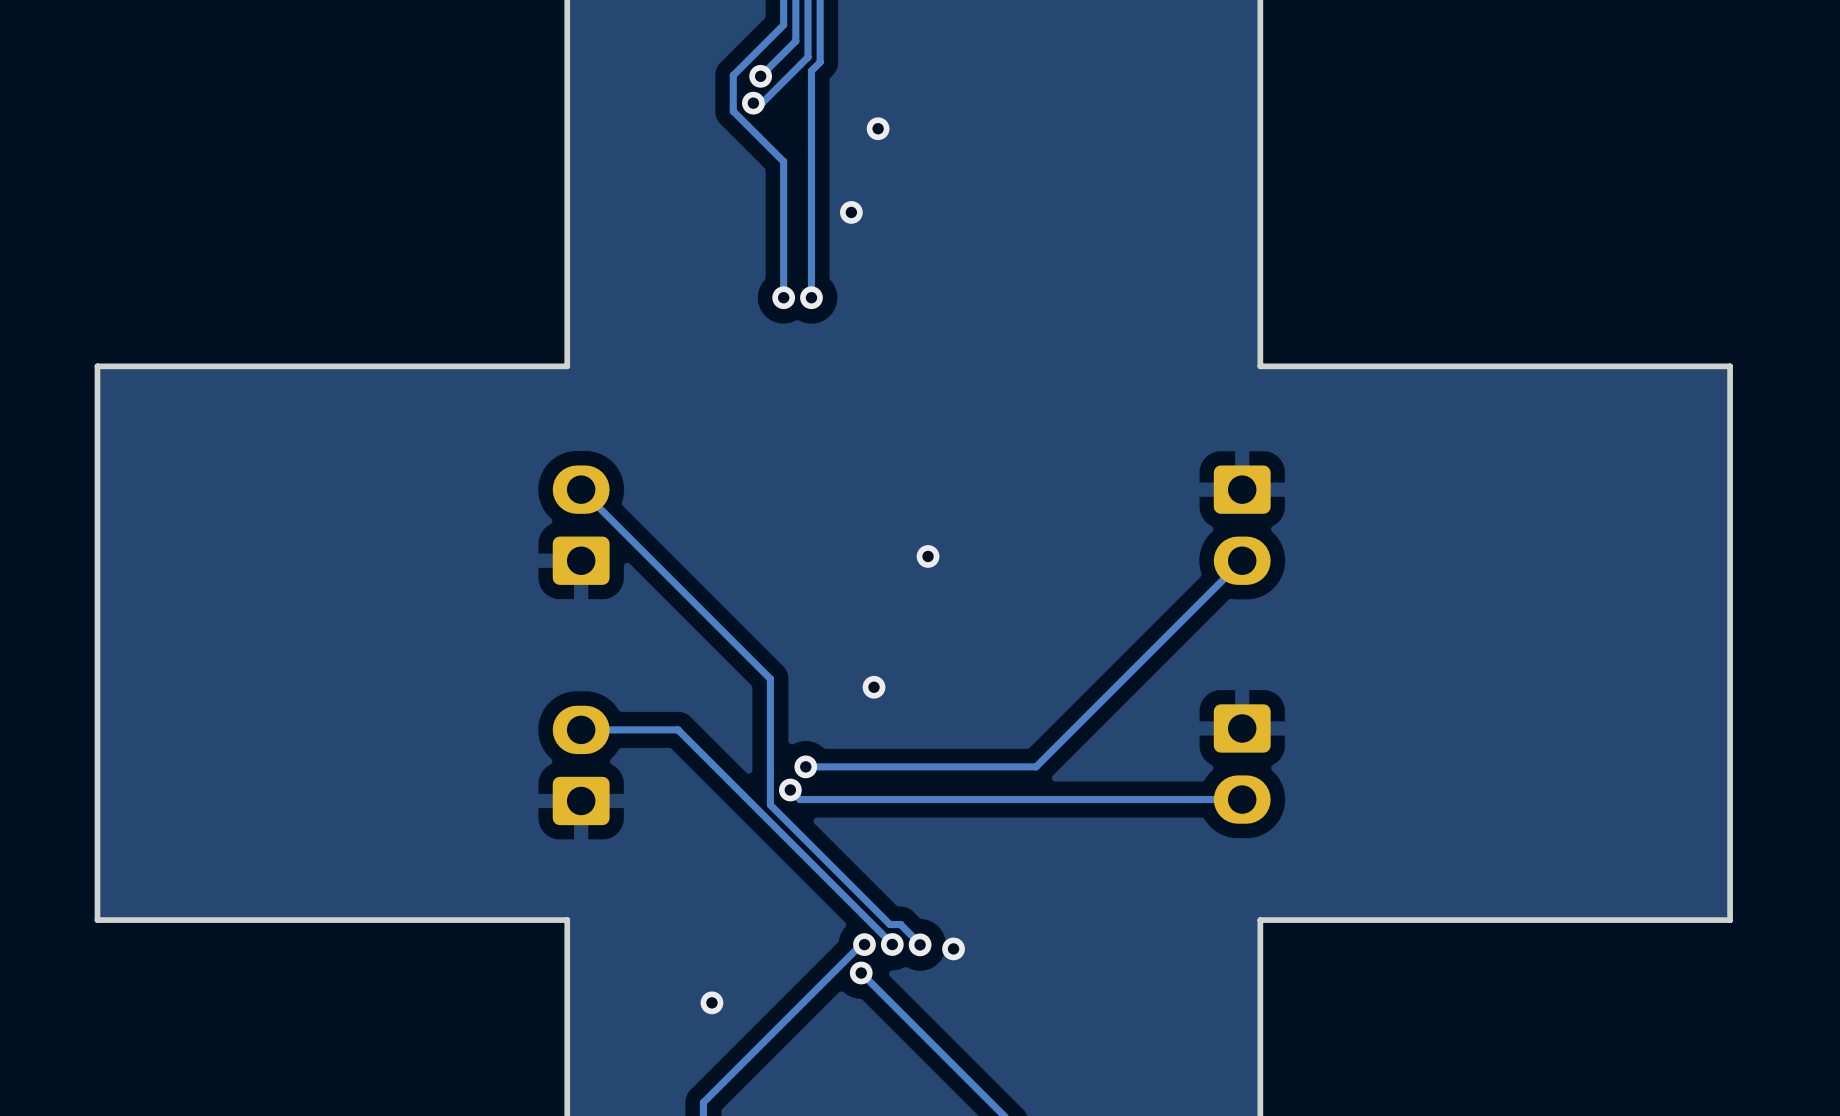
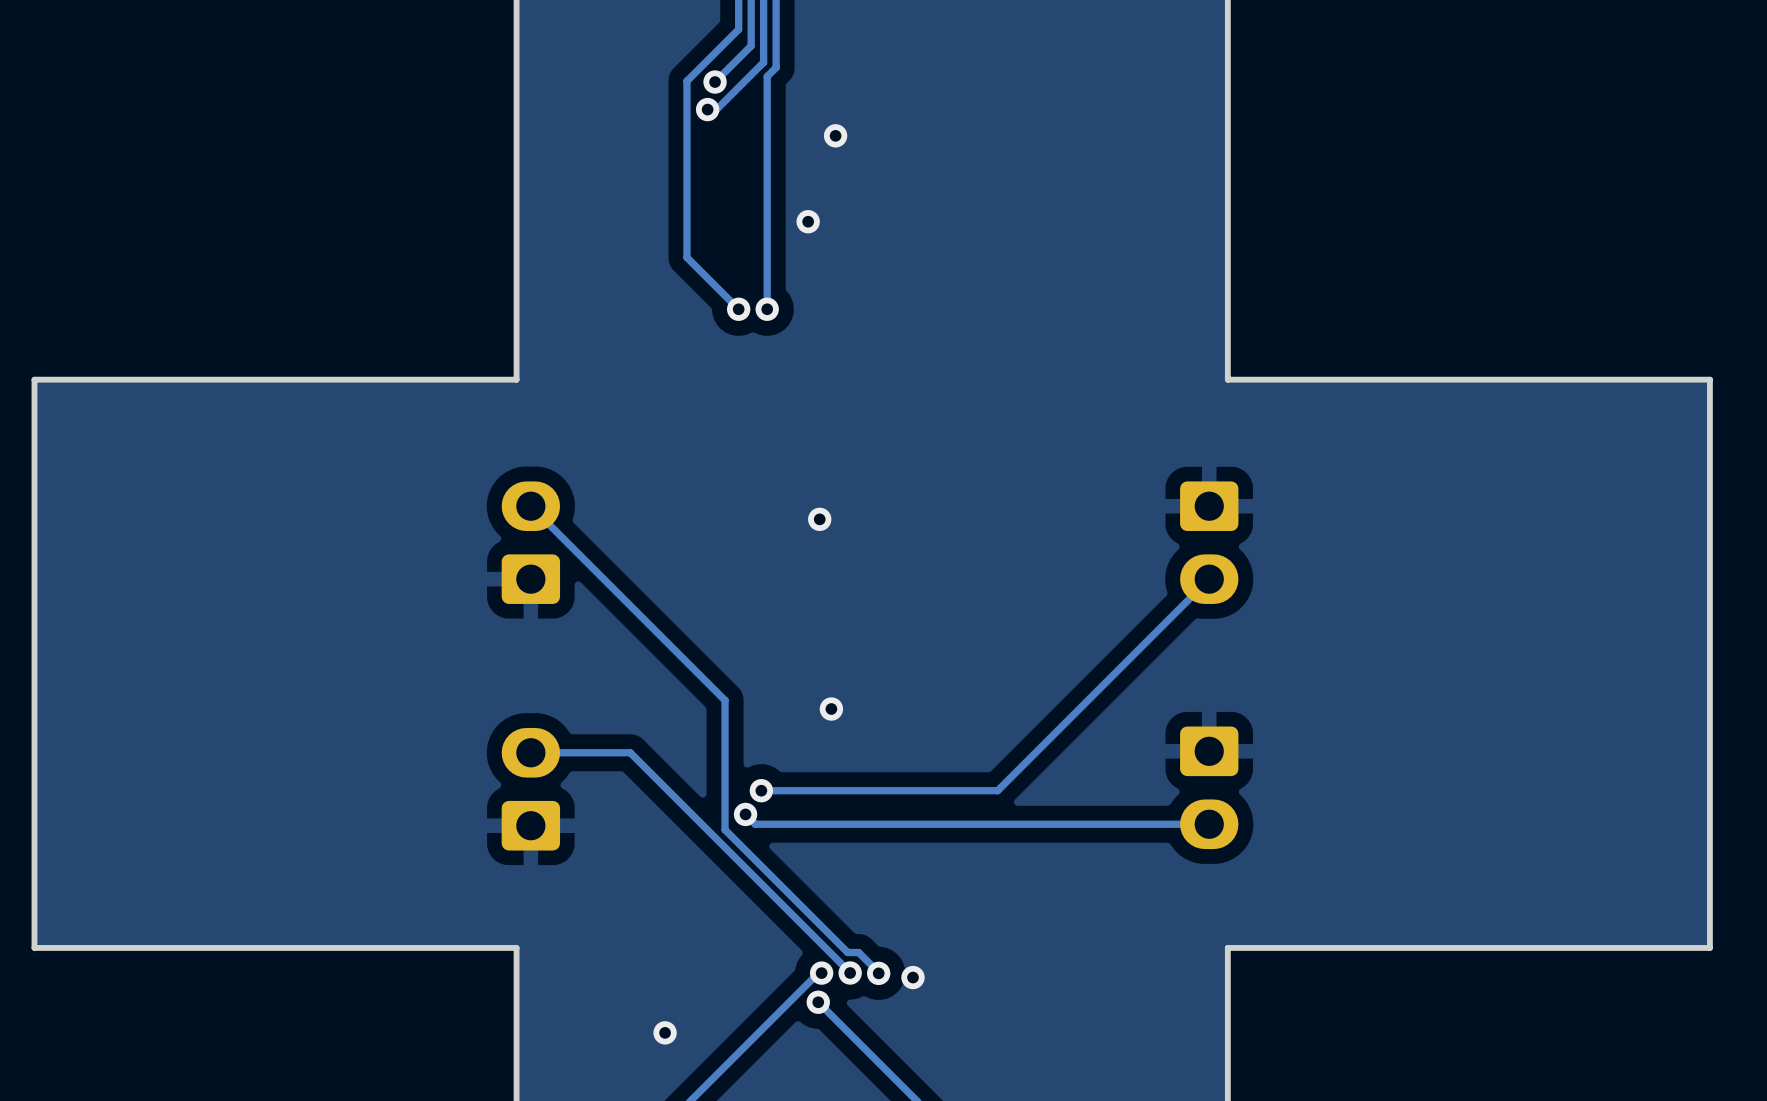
track: (733, 111) (783, 161) (783, 297) -> (686, 117) (686, 257) (738, 309)
via position: (928, 556) -> (819, 519)

